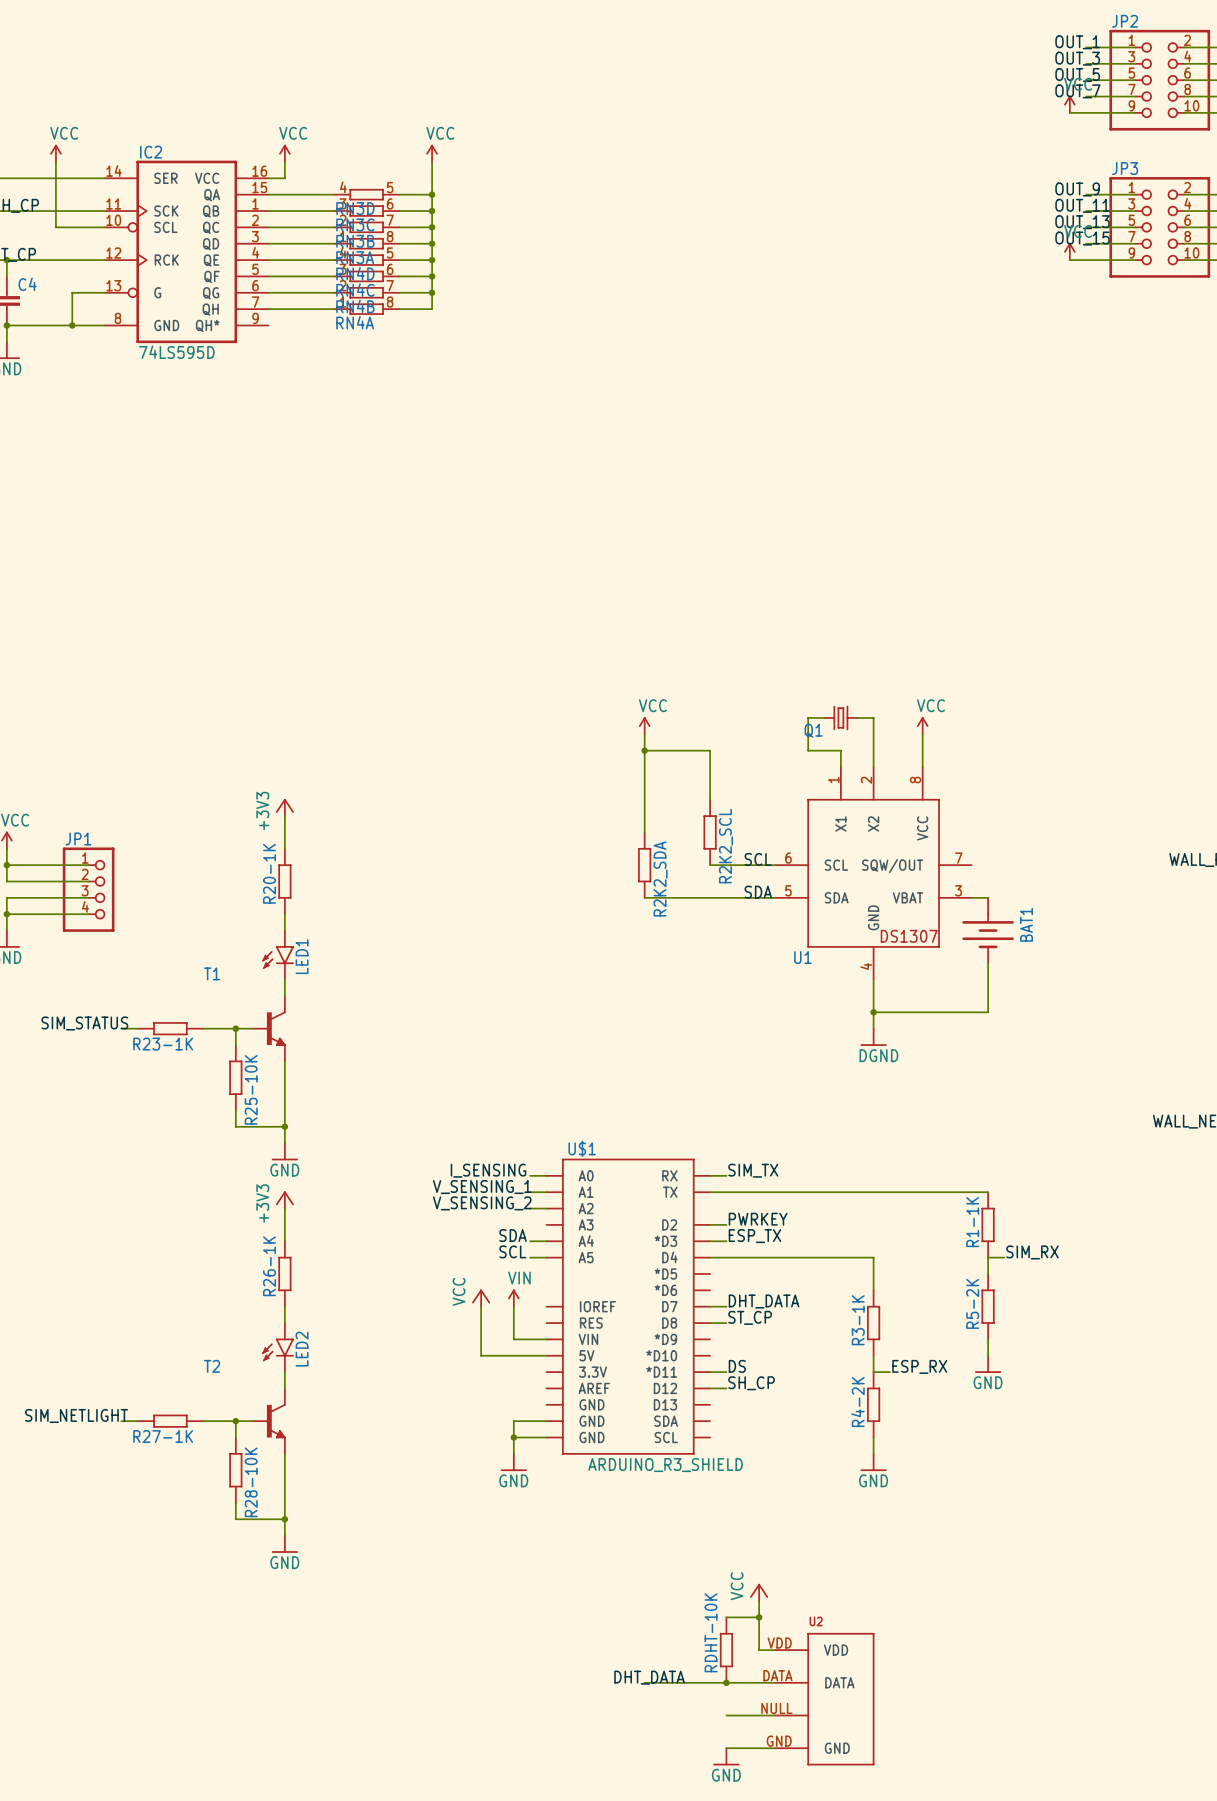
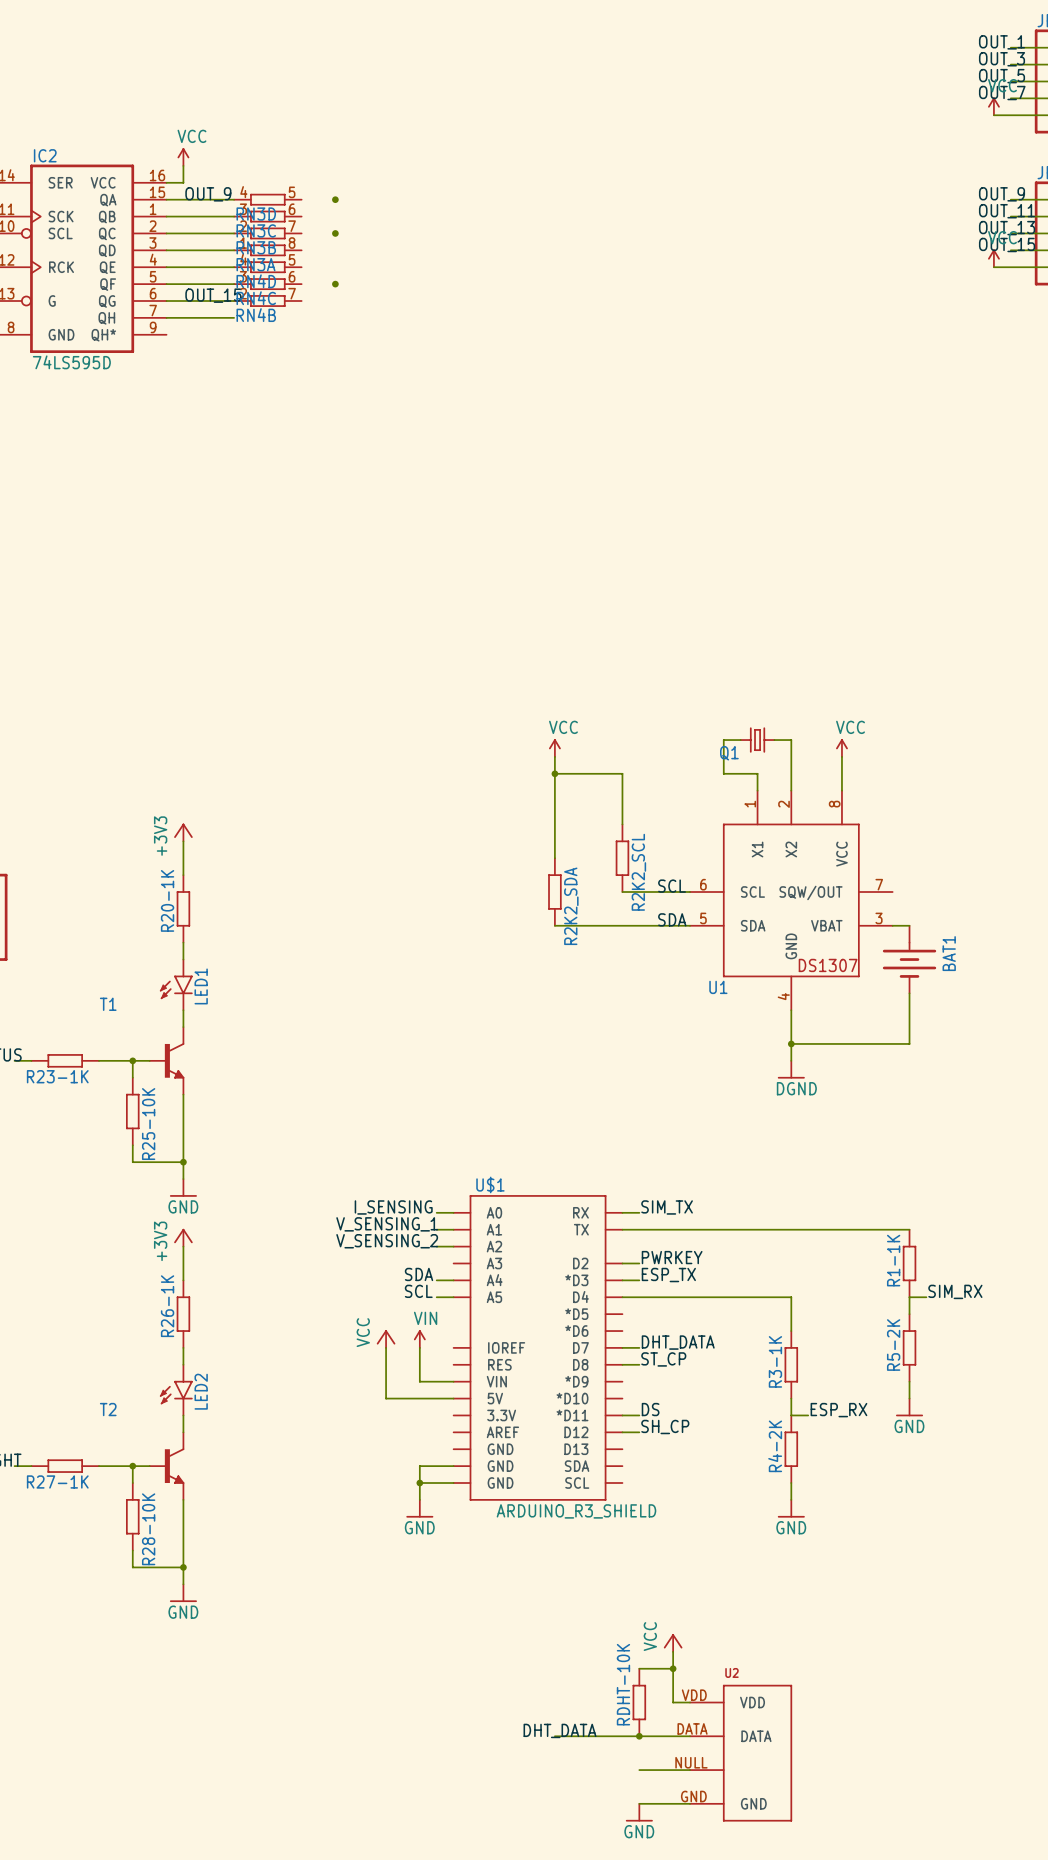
power symbol: VCC (432, 153) -> none
wire: (432, 161) (432, 309) (399, 309) -> none
label: none -> OUT_9 (208, 194)
wire: (399, 194) (432, 194) -> none
wire: (399, 211) (432, 211) -> none
junction: (432, 211) -> none
wire: (399, 227) (432, 227) -> none
wire: (399, 243) (432, 243) -> none
junction: (432, 243) -> none
wire: (399, 260) (432, 260) -> none
junction: (432, 260) -> none
wire: (399, 276) (432, 276) -> none
label: none -> OUT_15 (213, 295)
wire: (399, 292) (432, 292) -> none
junction: (432, 292) -> none
RN4A: (366, 309) -> none

